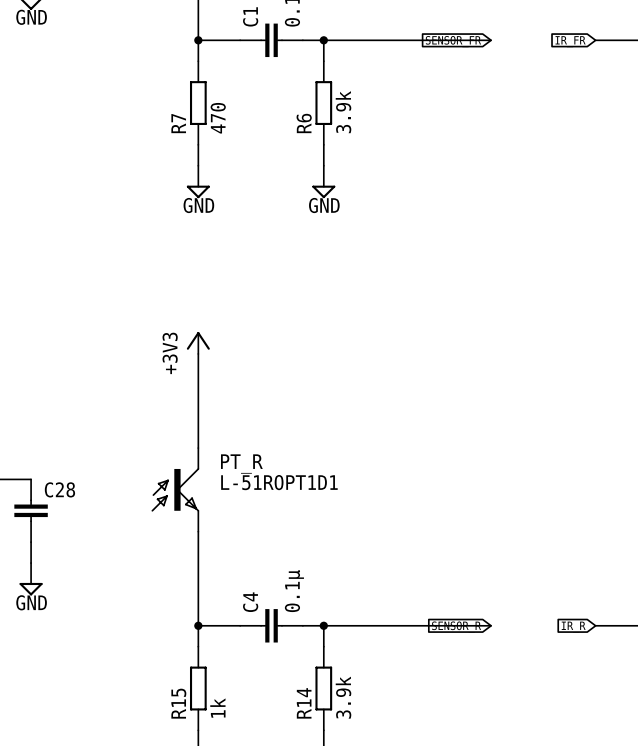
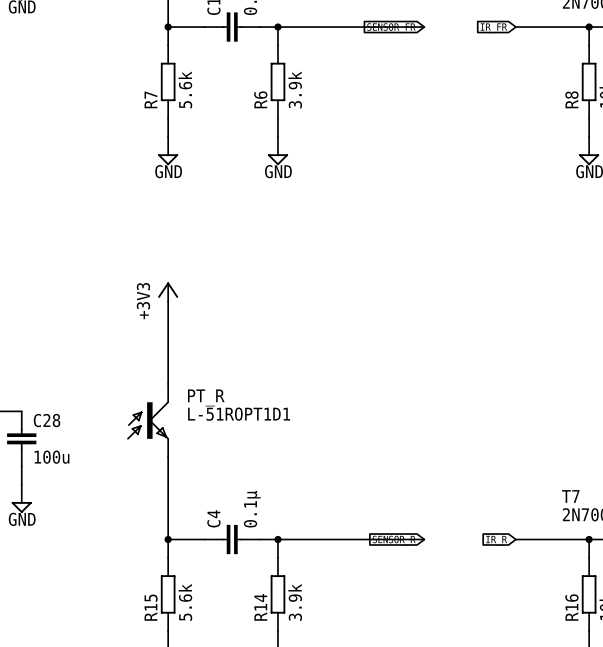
R7 value: 470 (218, 118) -> 5.6k (185, 89)
C28 value: none -> 100u (52, 457)
R15 value: 1k (217, 708) -> 5.6k (185, 602)

